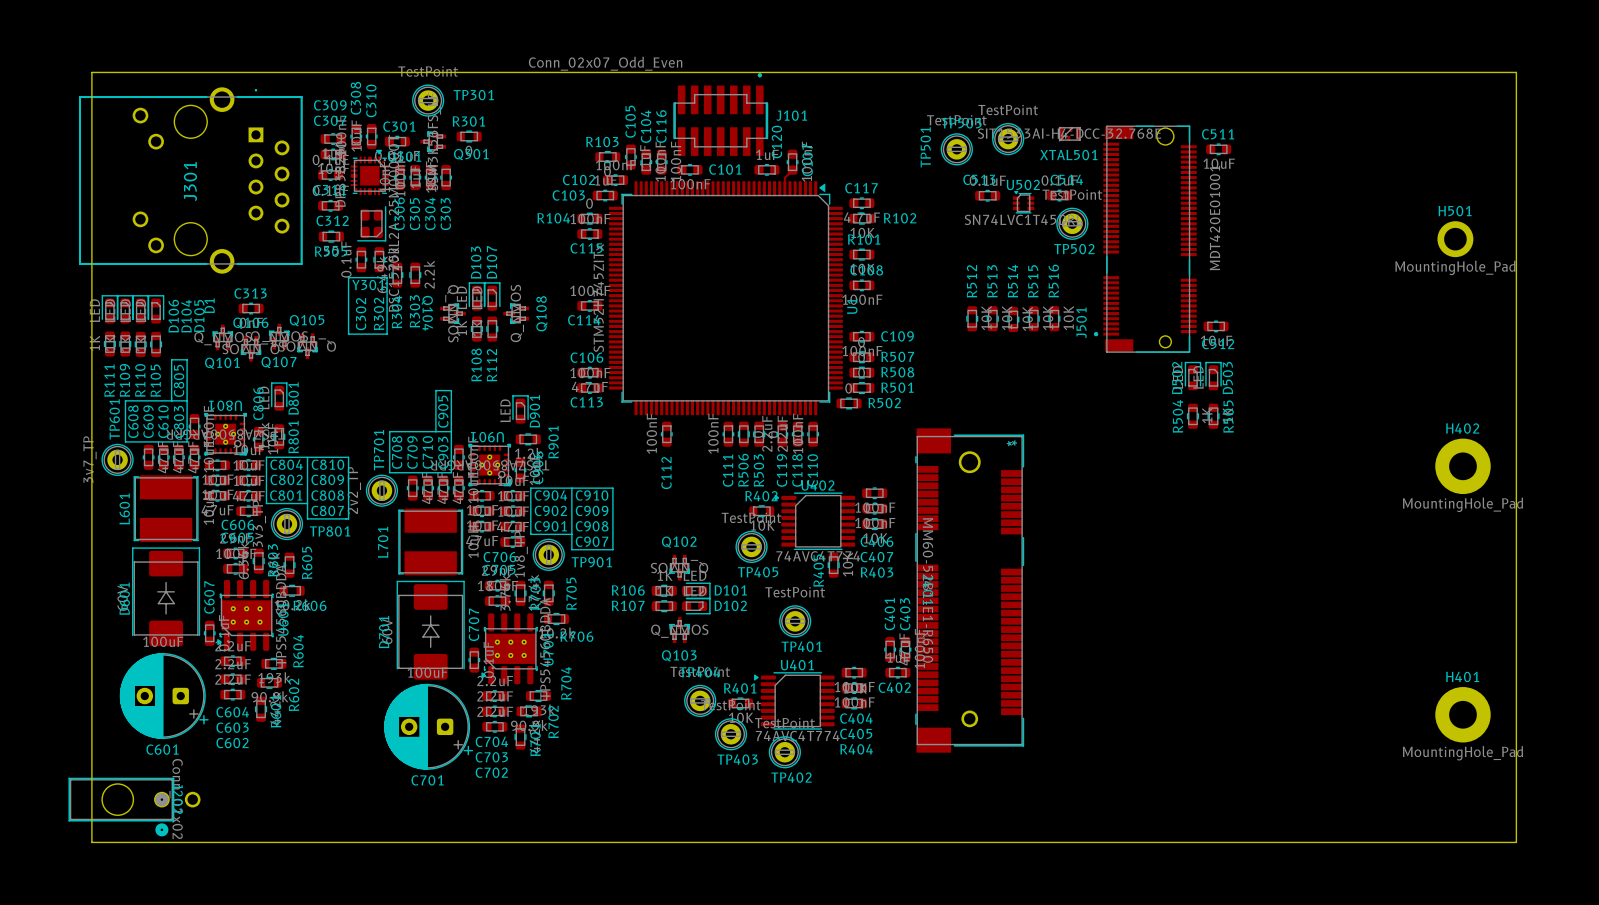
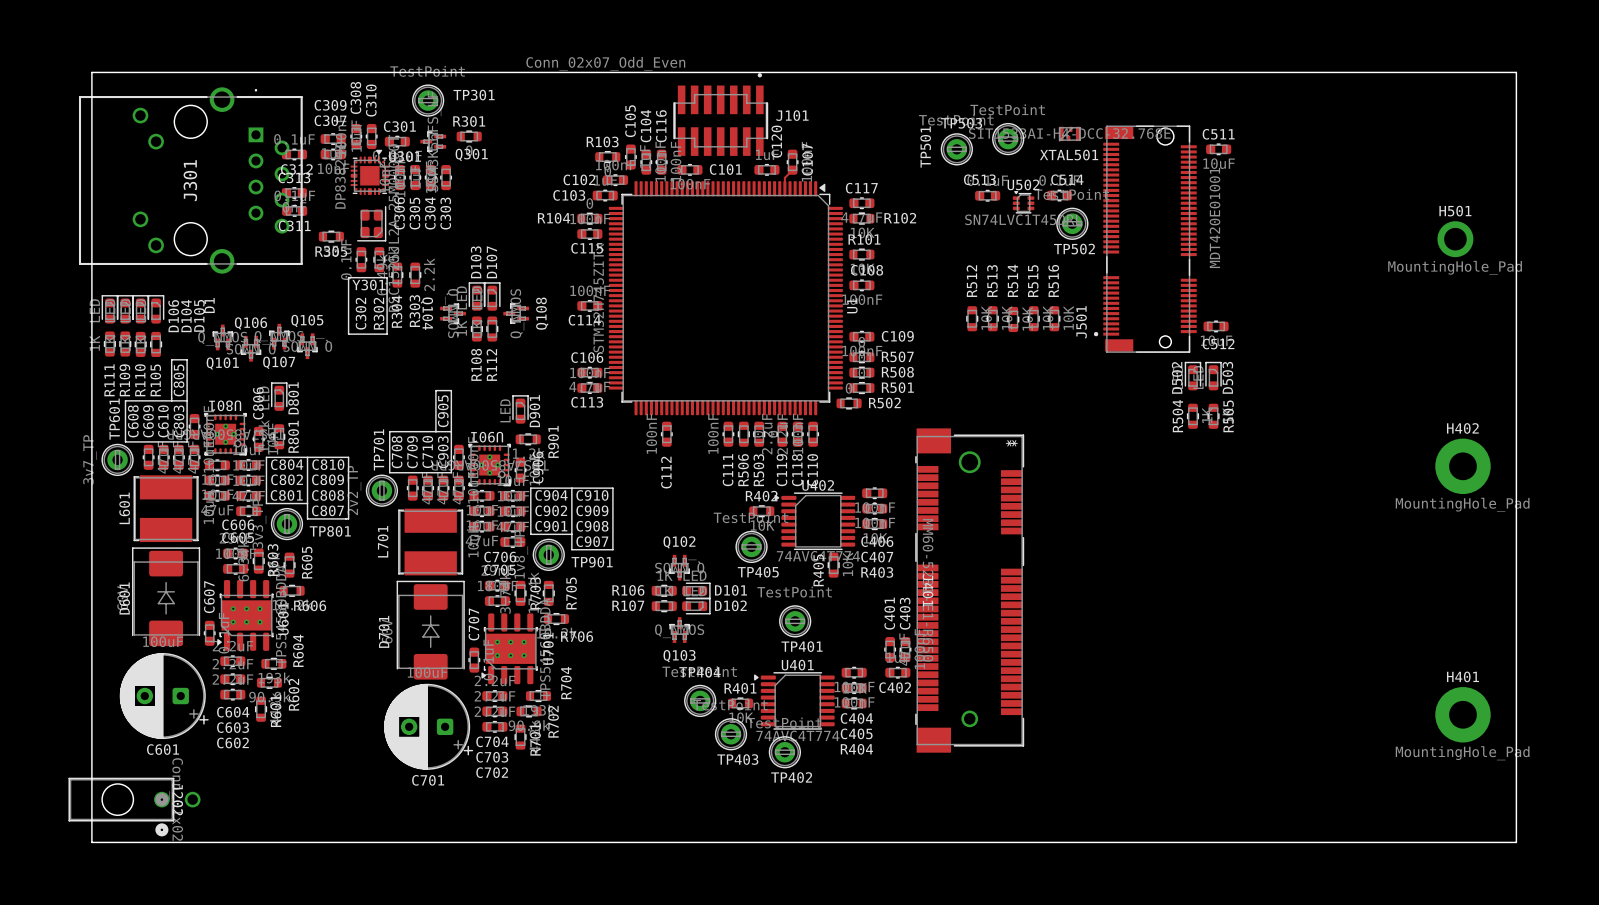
C311 position: (330, 175) -> (294, 210)
C312 position: (330, 205) -> (294, 154)
C313 position: (251, 308) -> (294, 192)

